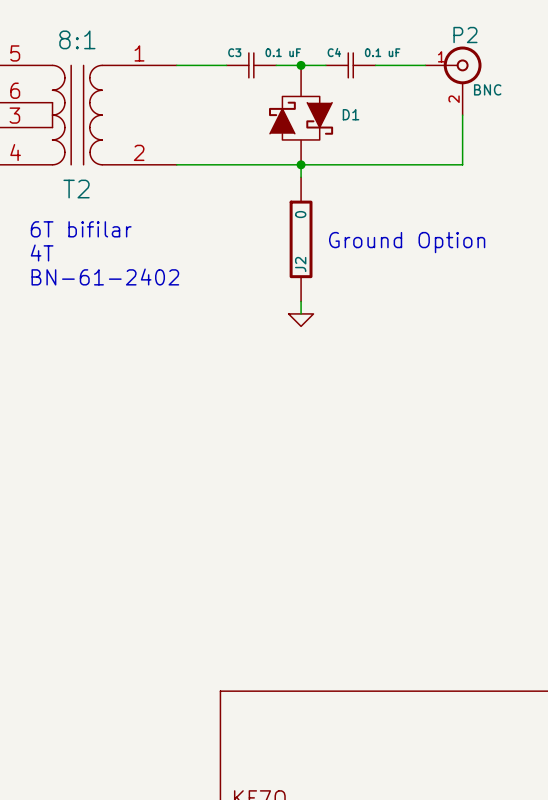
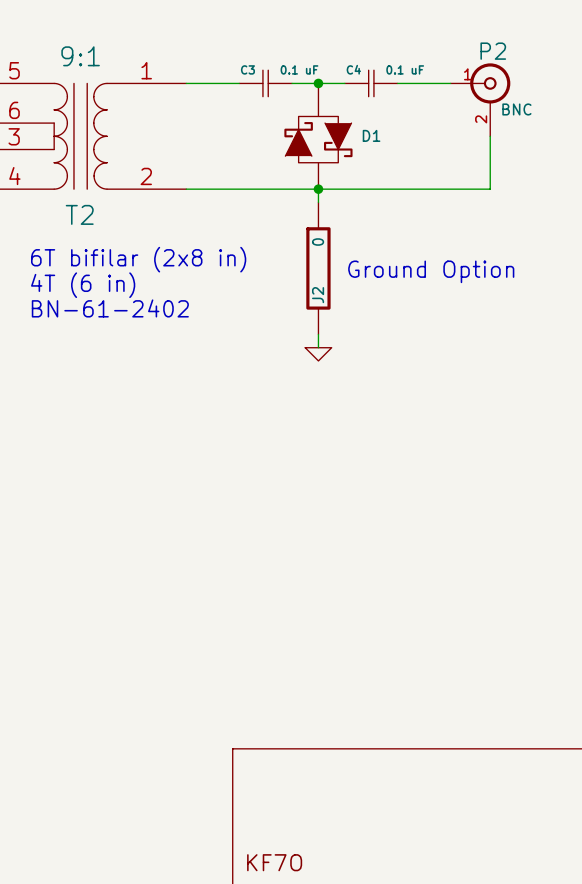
T2 value: 8:1 (77, 39) -> 9:1 (80, 56)
text: 6T bifilar (81, 229) -> 6T bifilar (2x8 in) (138, 259)
text: 4T (42, 253) -> 4T (6 in) (83, 285)

